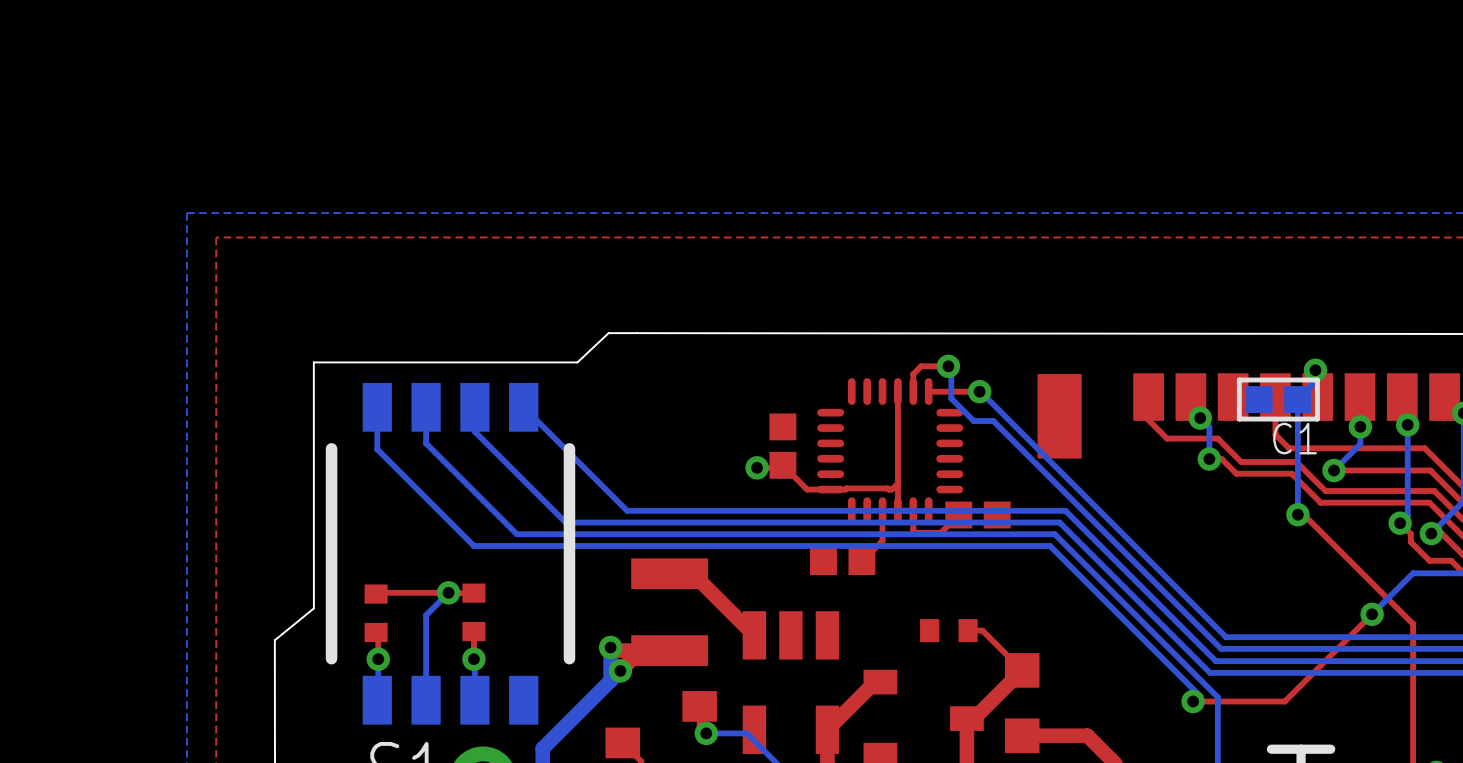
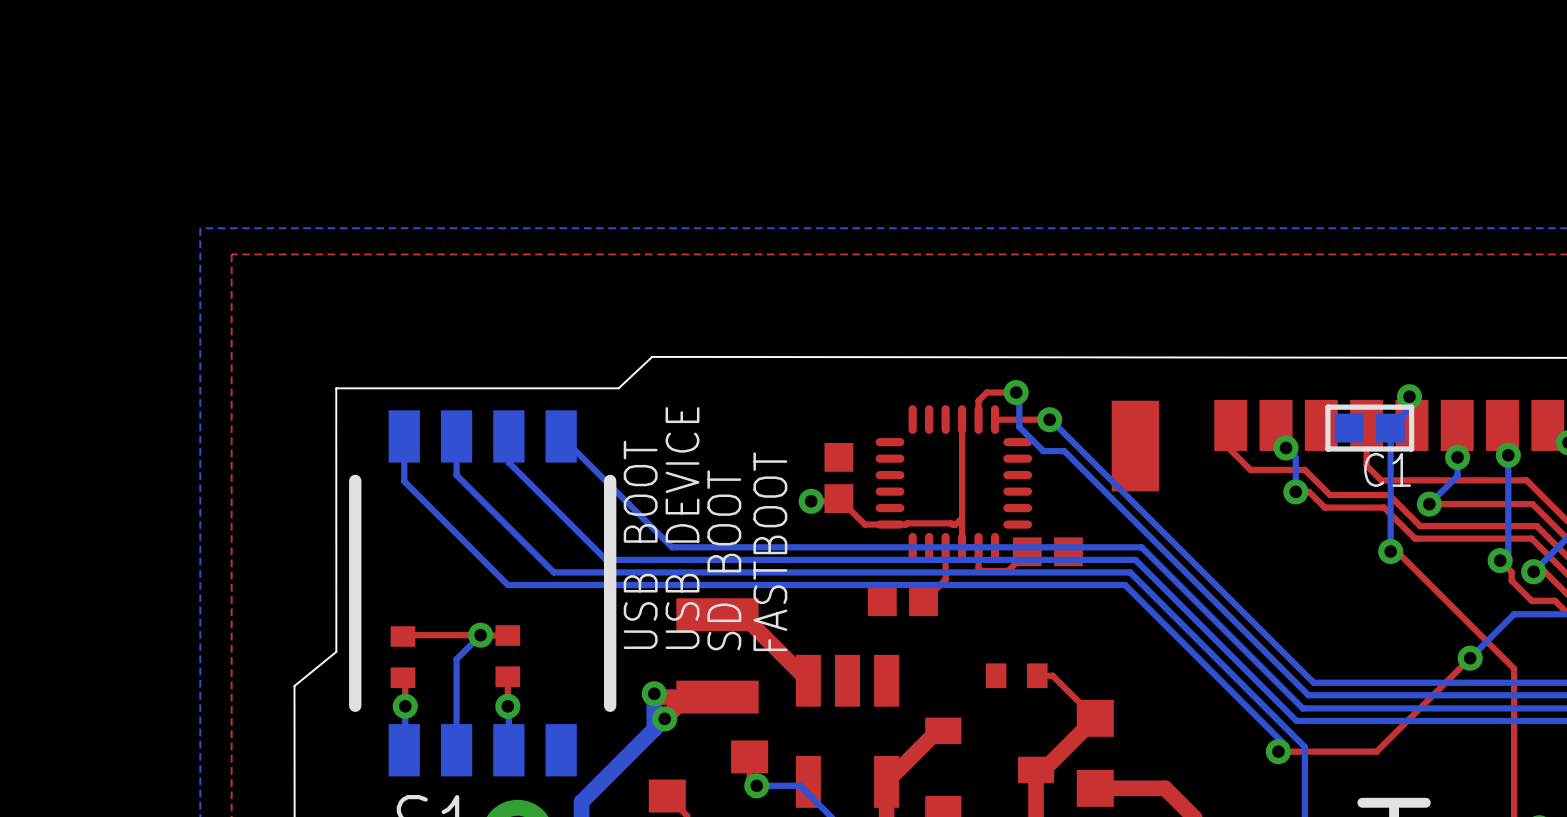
text: none -> USB DEVICE (682, 528)
text: none -> USB BOOT (640, 544)
text: none -> FASTBOOT (770, 551)
text: none -> SD BOOT (724, 560)

